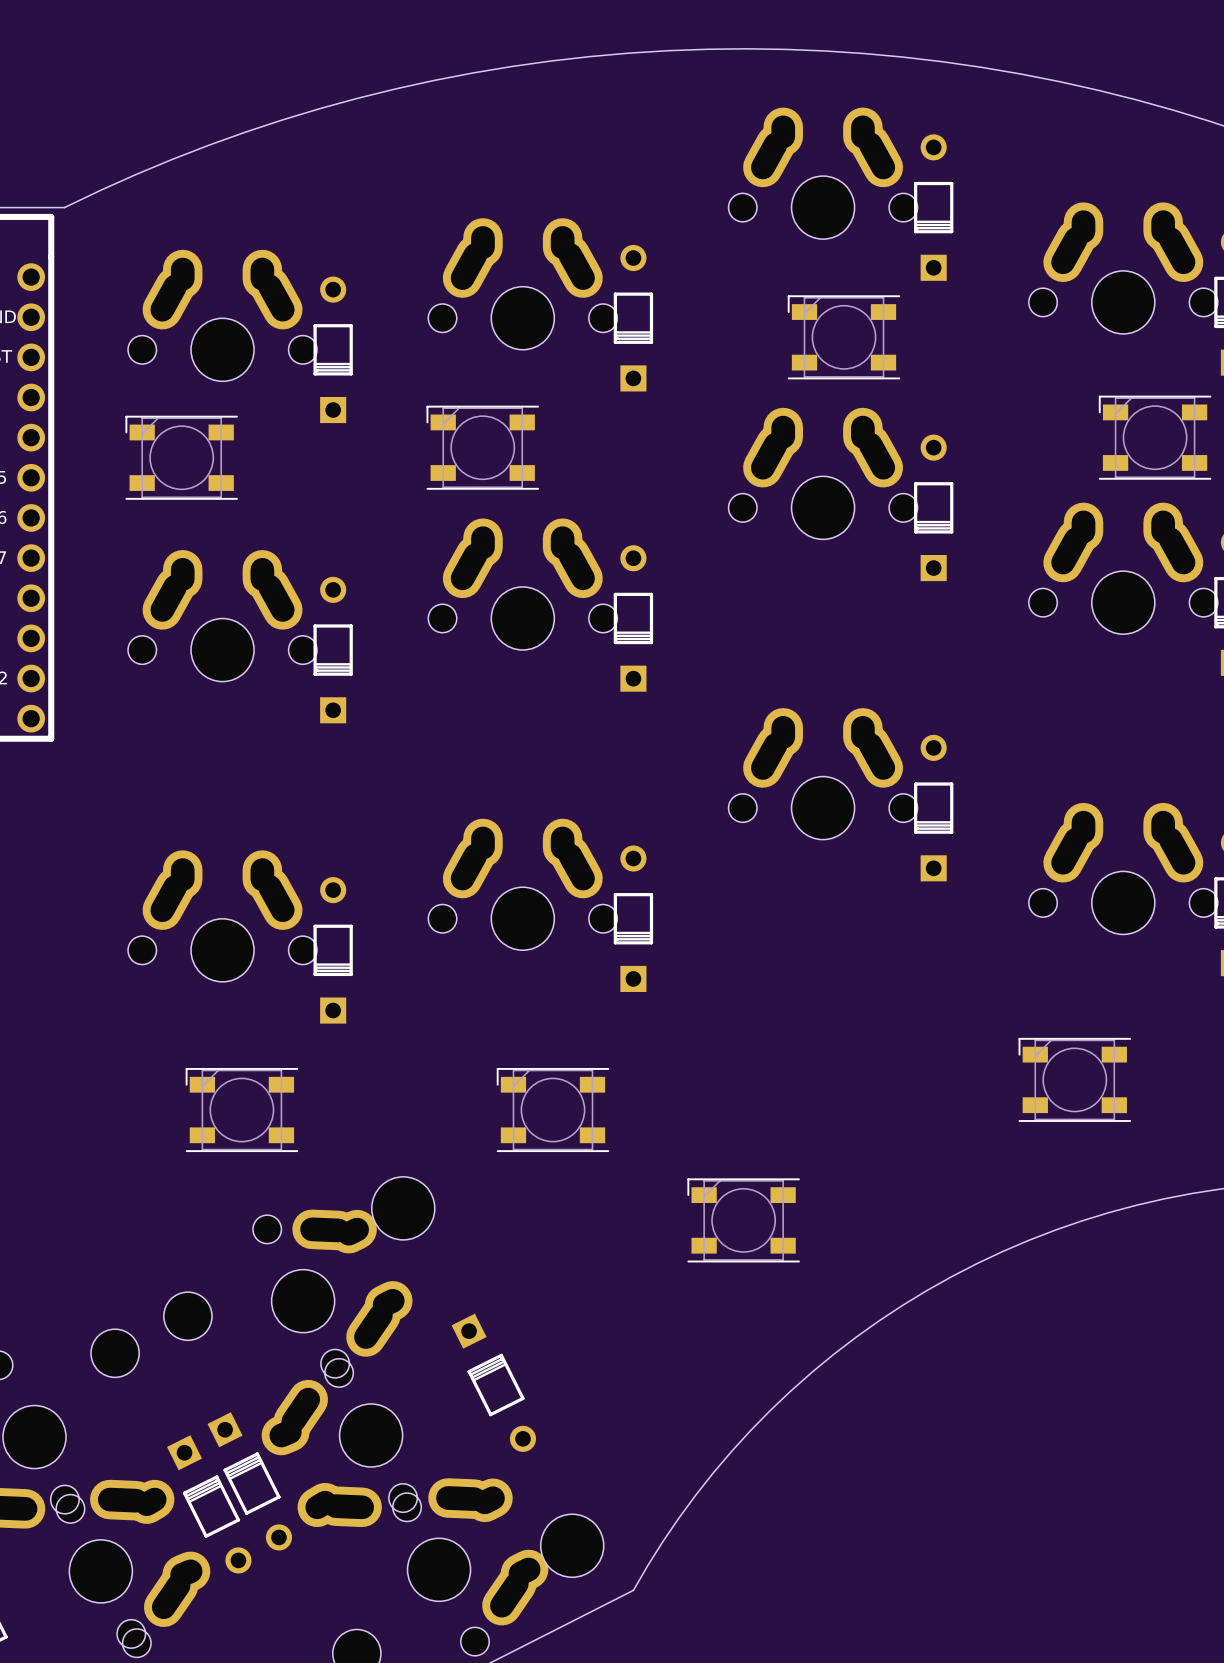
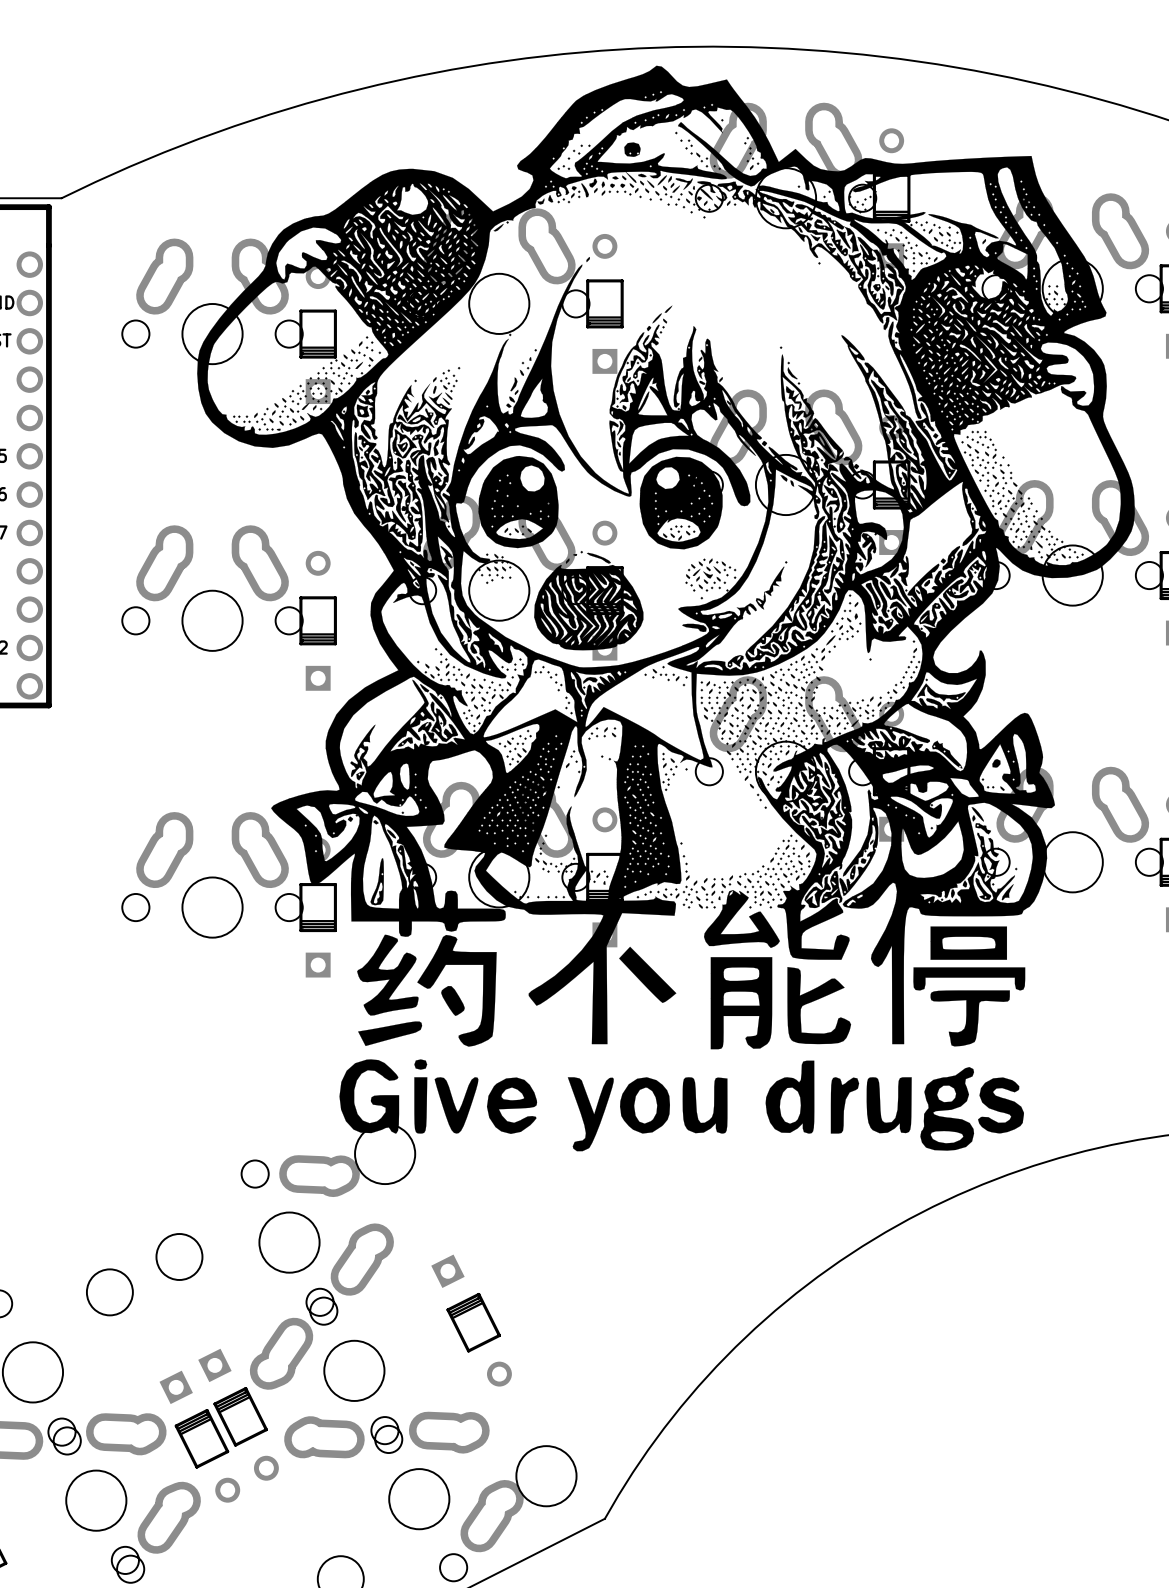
drawing: none -> [197, 65, 1135, 1152]
part: (844, 337) -> none
part: (1155, 437) -> none
part: (482, 447) -> none
part: (181, 457) -> none
part: (1074, 1079) -> none
part: (241, 1110) -> none
part: (552, 1110) -> none
part: (743, 1220) -> none

